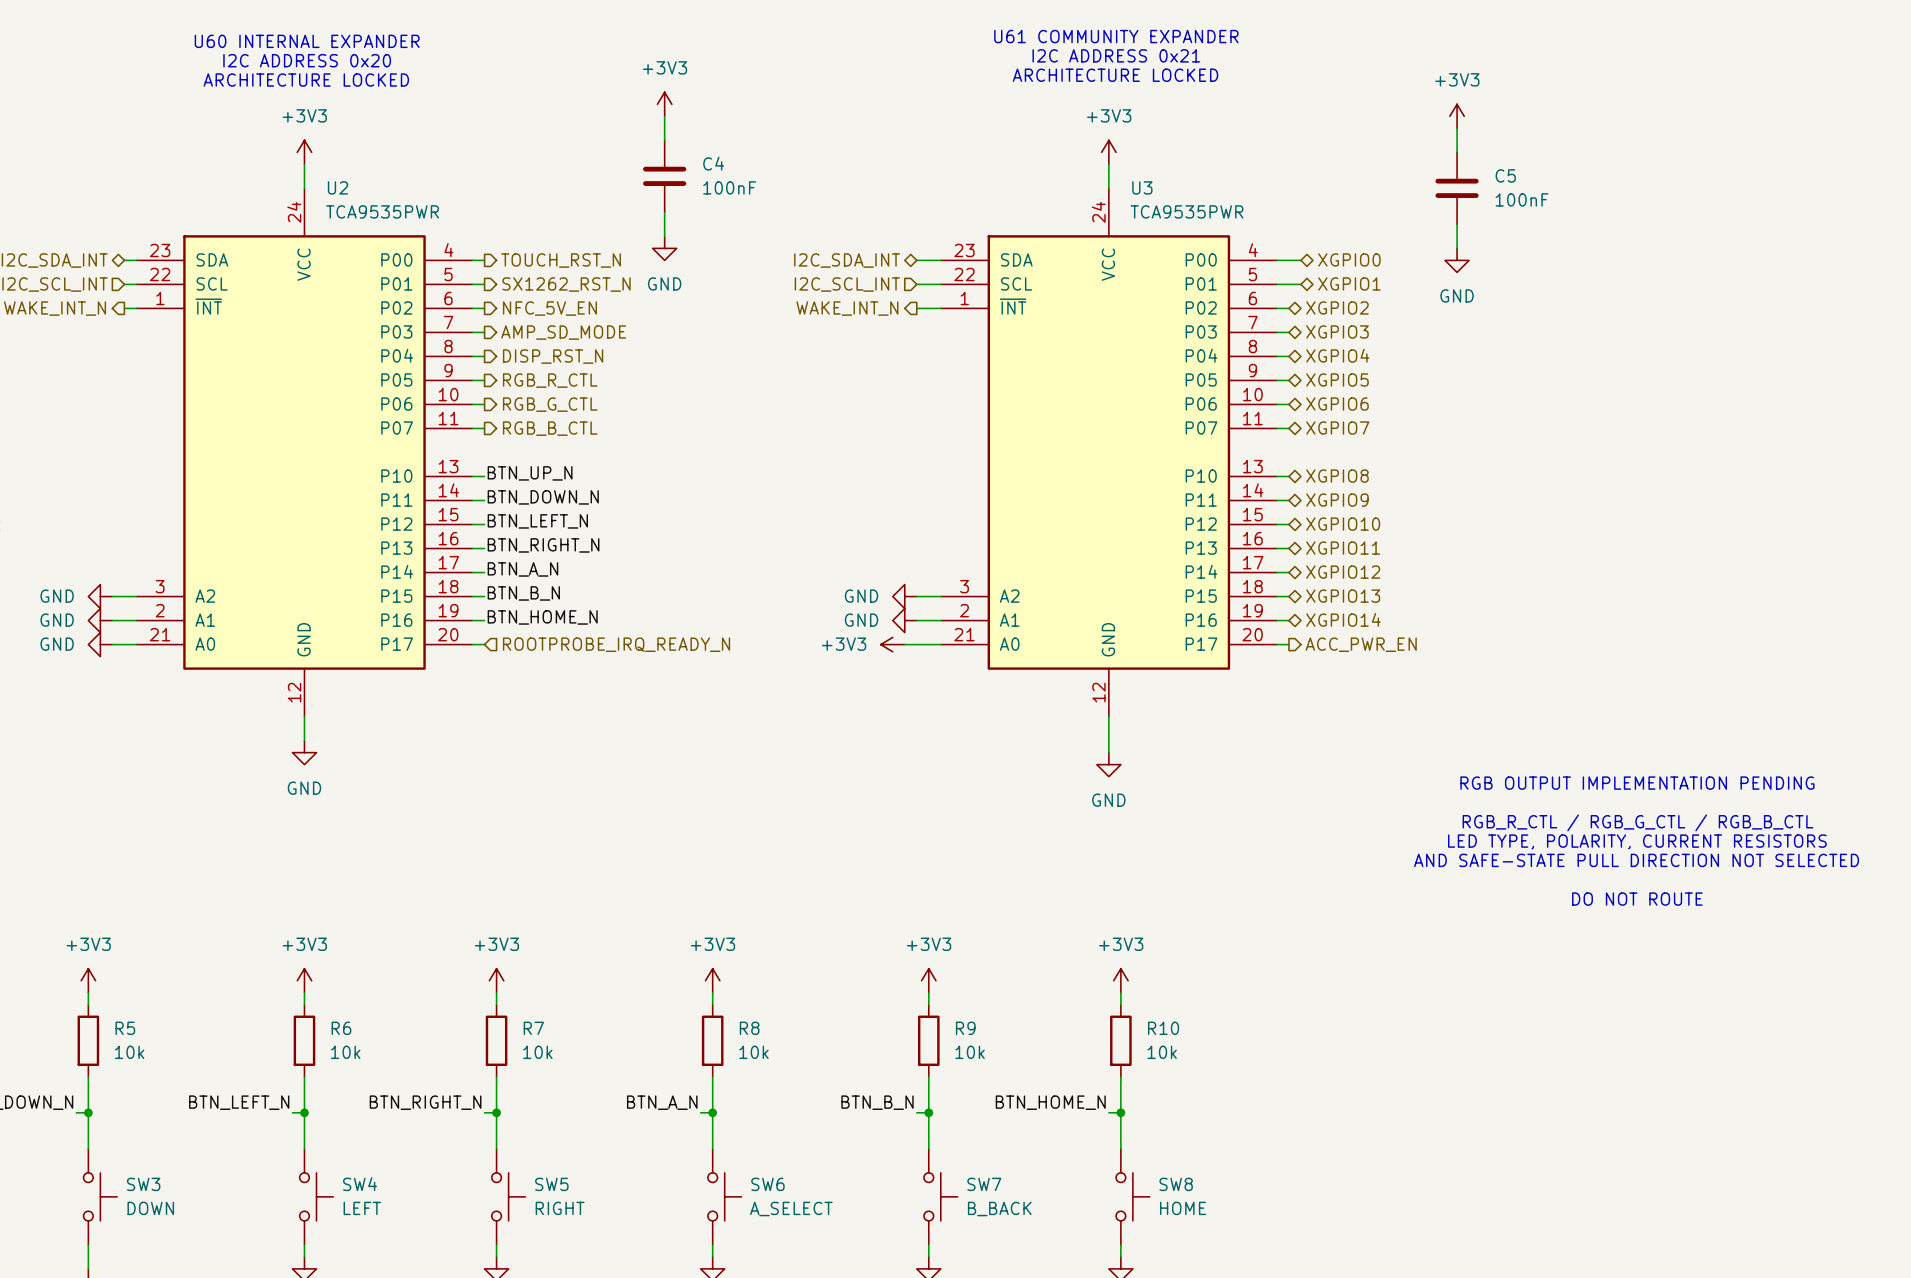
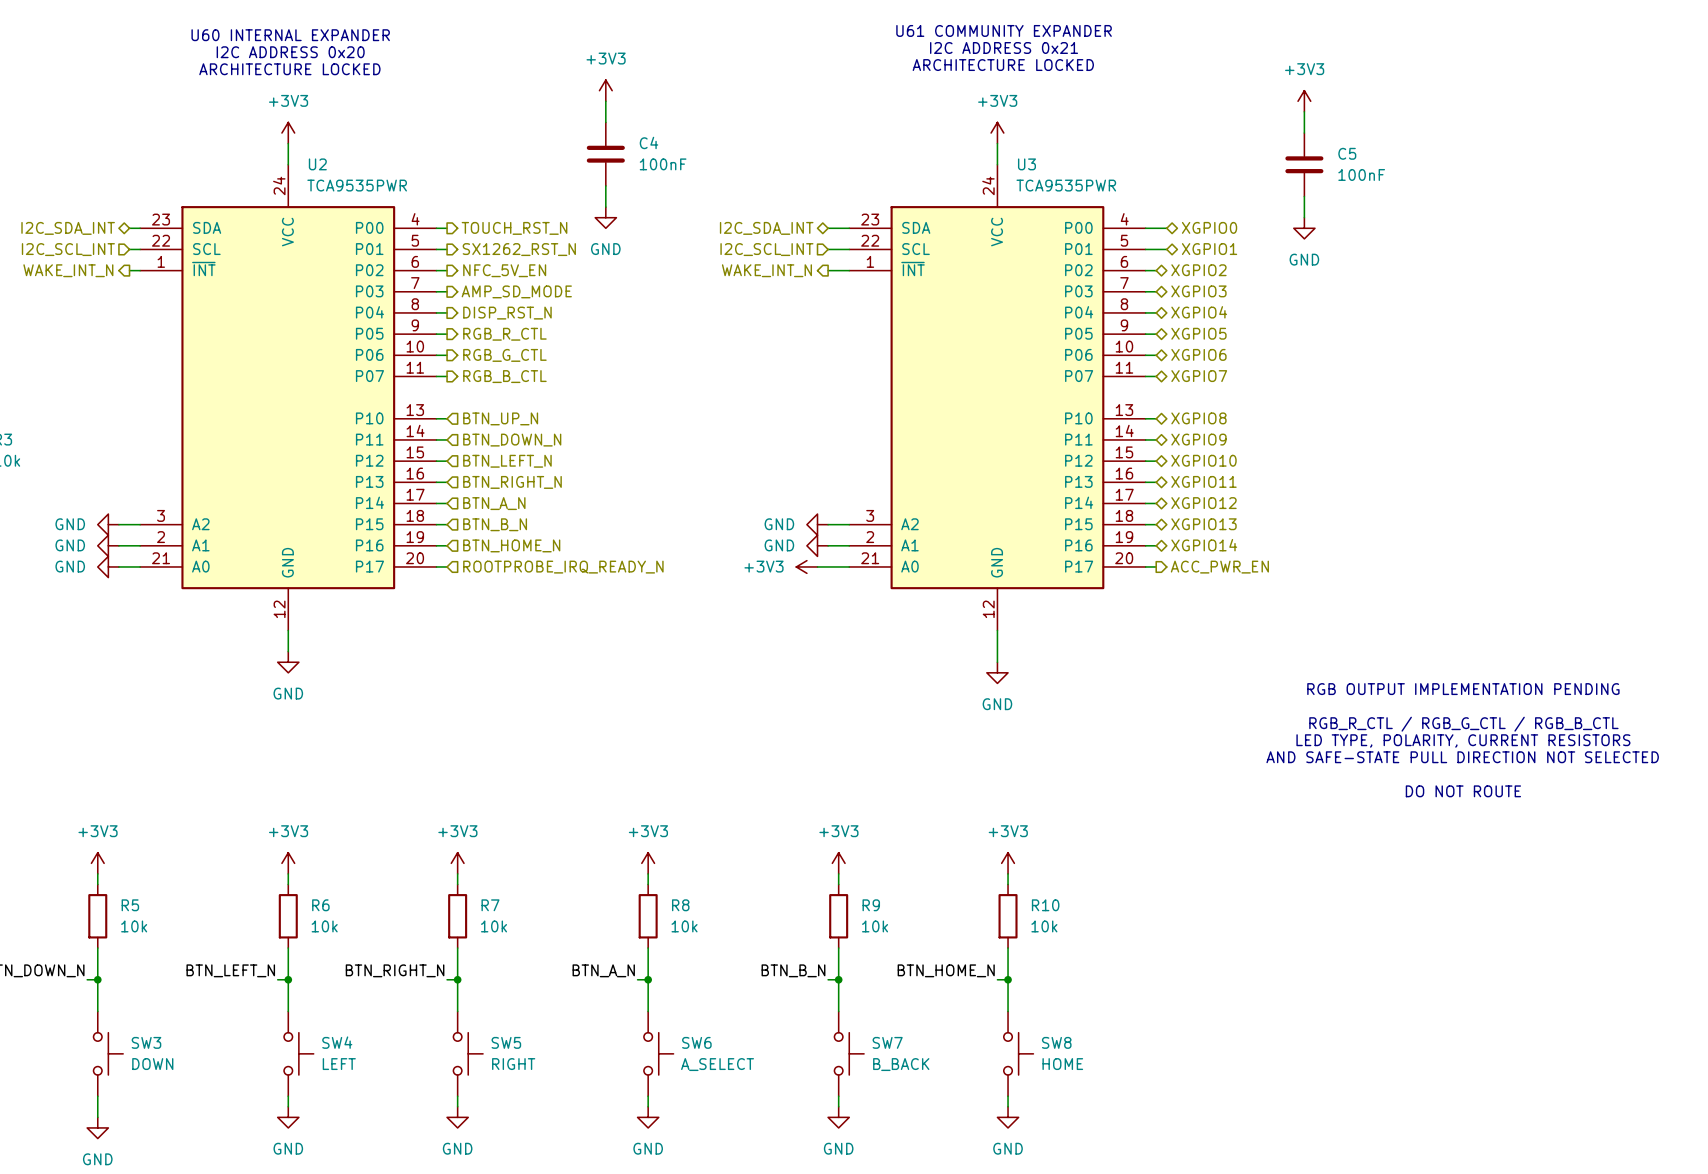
label: BTN_UP_N (530, 473) -> none
hierarchical label: none -> BTN_UP_N (500, 418)
label: BTN_DOWN_N (543, 497) -> none
hierarchical label: none -> BTN_DOWN_N (512, 440)
label: BTN_LEFT_N (537, 521) -> none
hierarchical label: none -> BTN_LEFT_N (507, 461)
label: BTN_RIGHT_N (543, 545) -> none
hierarchical label: none -> BTN_RIGHT_N (512, 482)
label: BTN_A_N (522, 569) -> none
hierarchical label: none -> BTN_A_N (494, 503)
label: BTN_B_N (523, 593) -> none
hierarchical label: none -> BTN_B_N (495, 524)
label: BTN_HOME_N (542, 617) -> none
hierarchical label: none -> BTN_HOME_N (511, 545)

